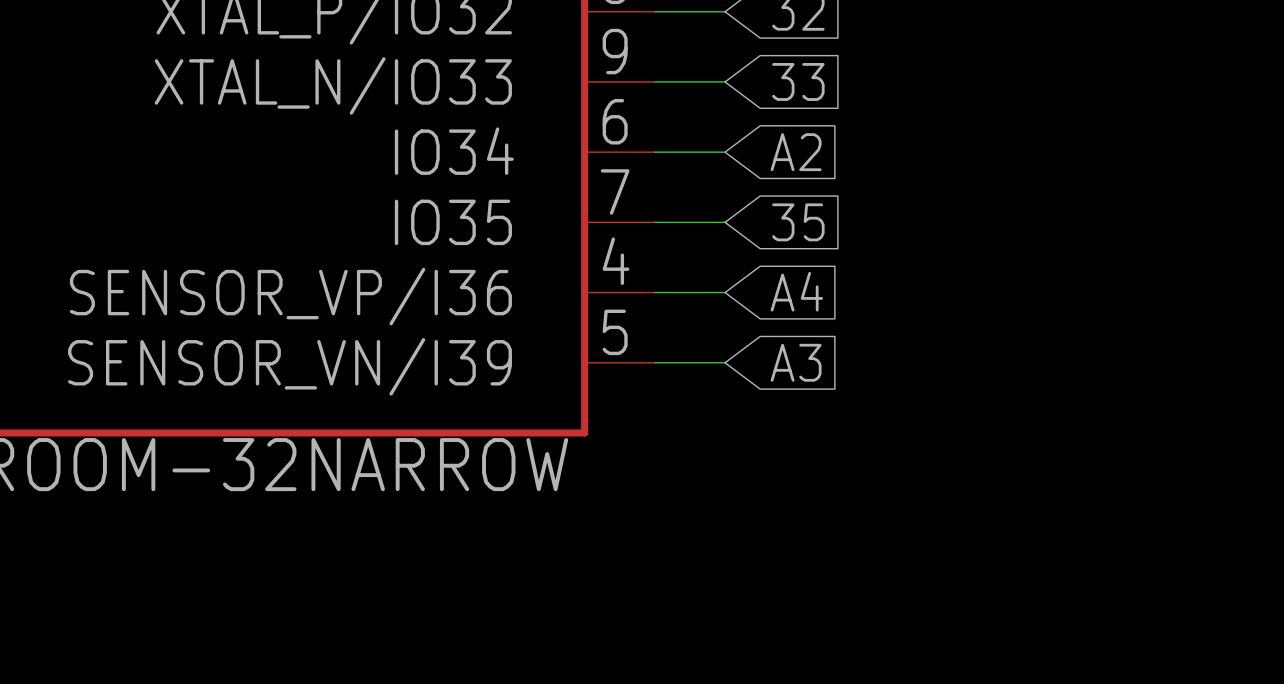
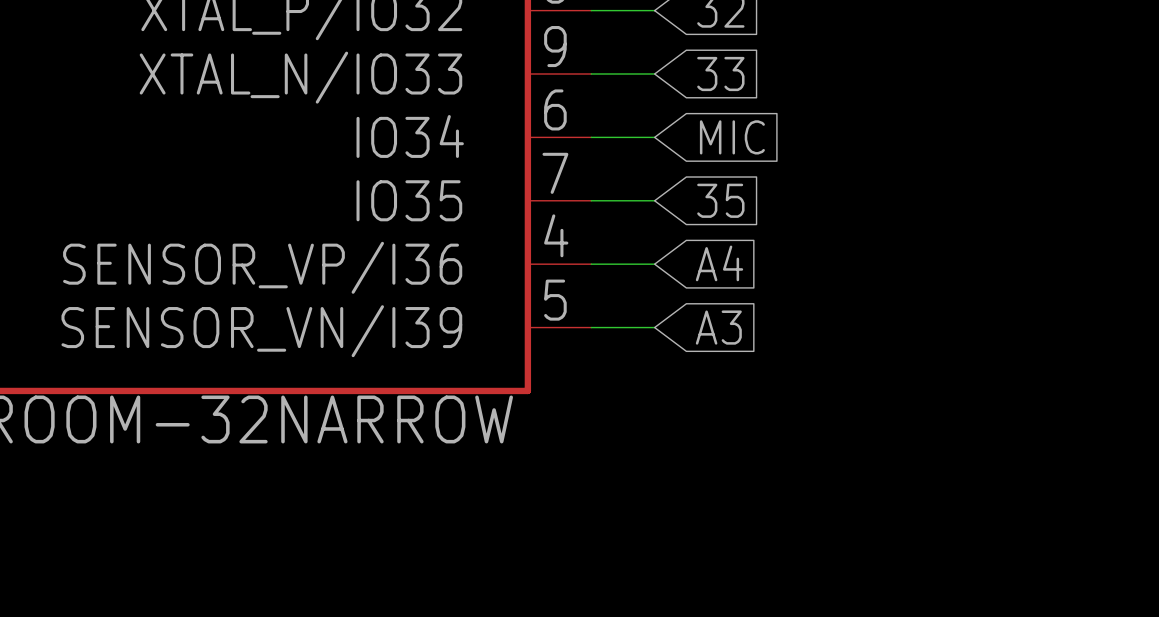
global label: A2 (796, 152) -> MIC (732, 137)

